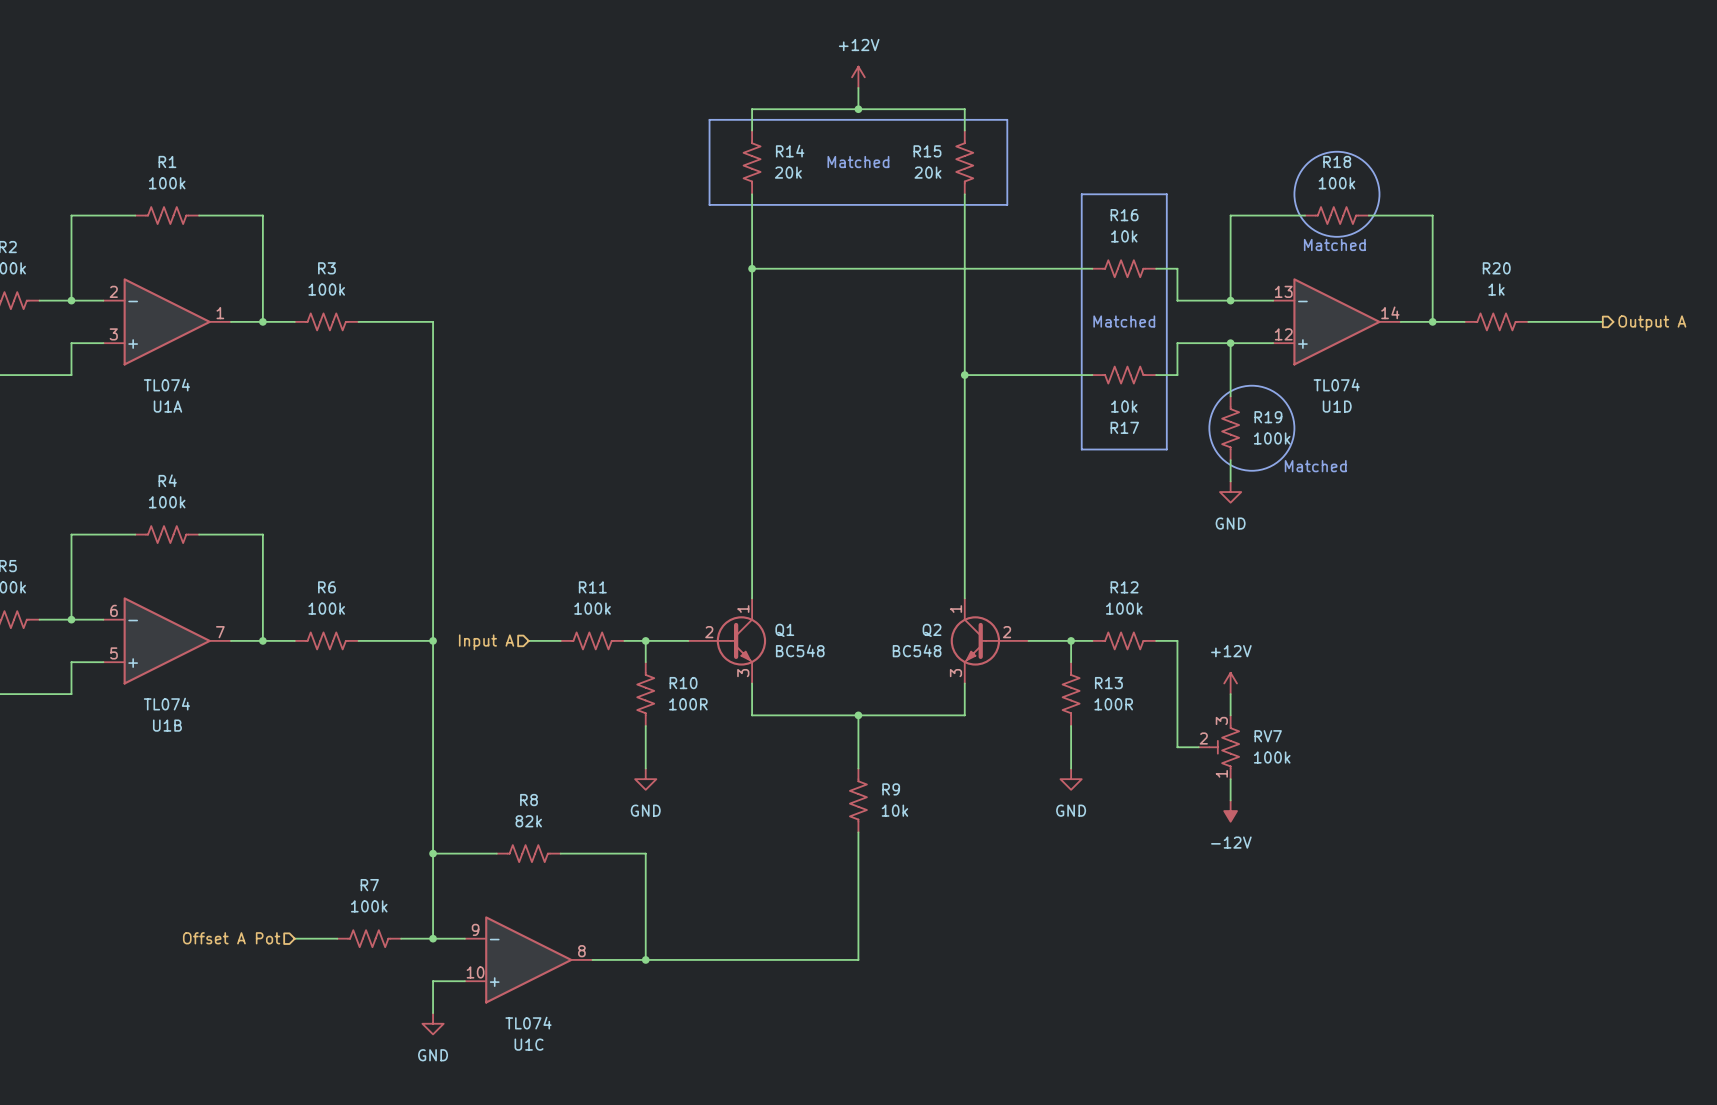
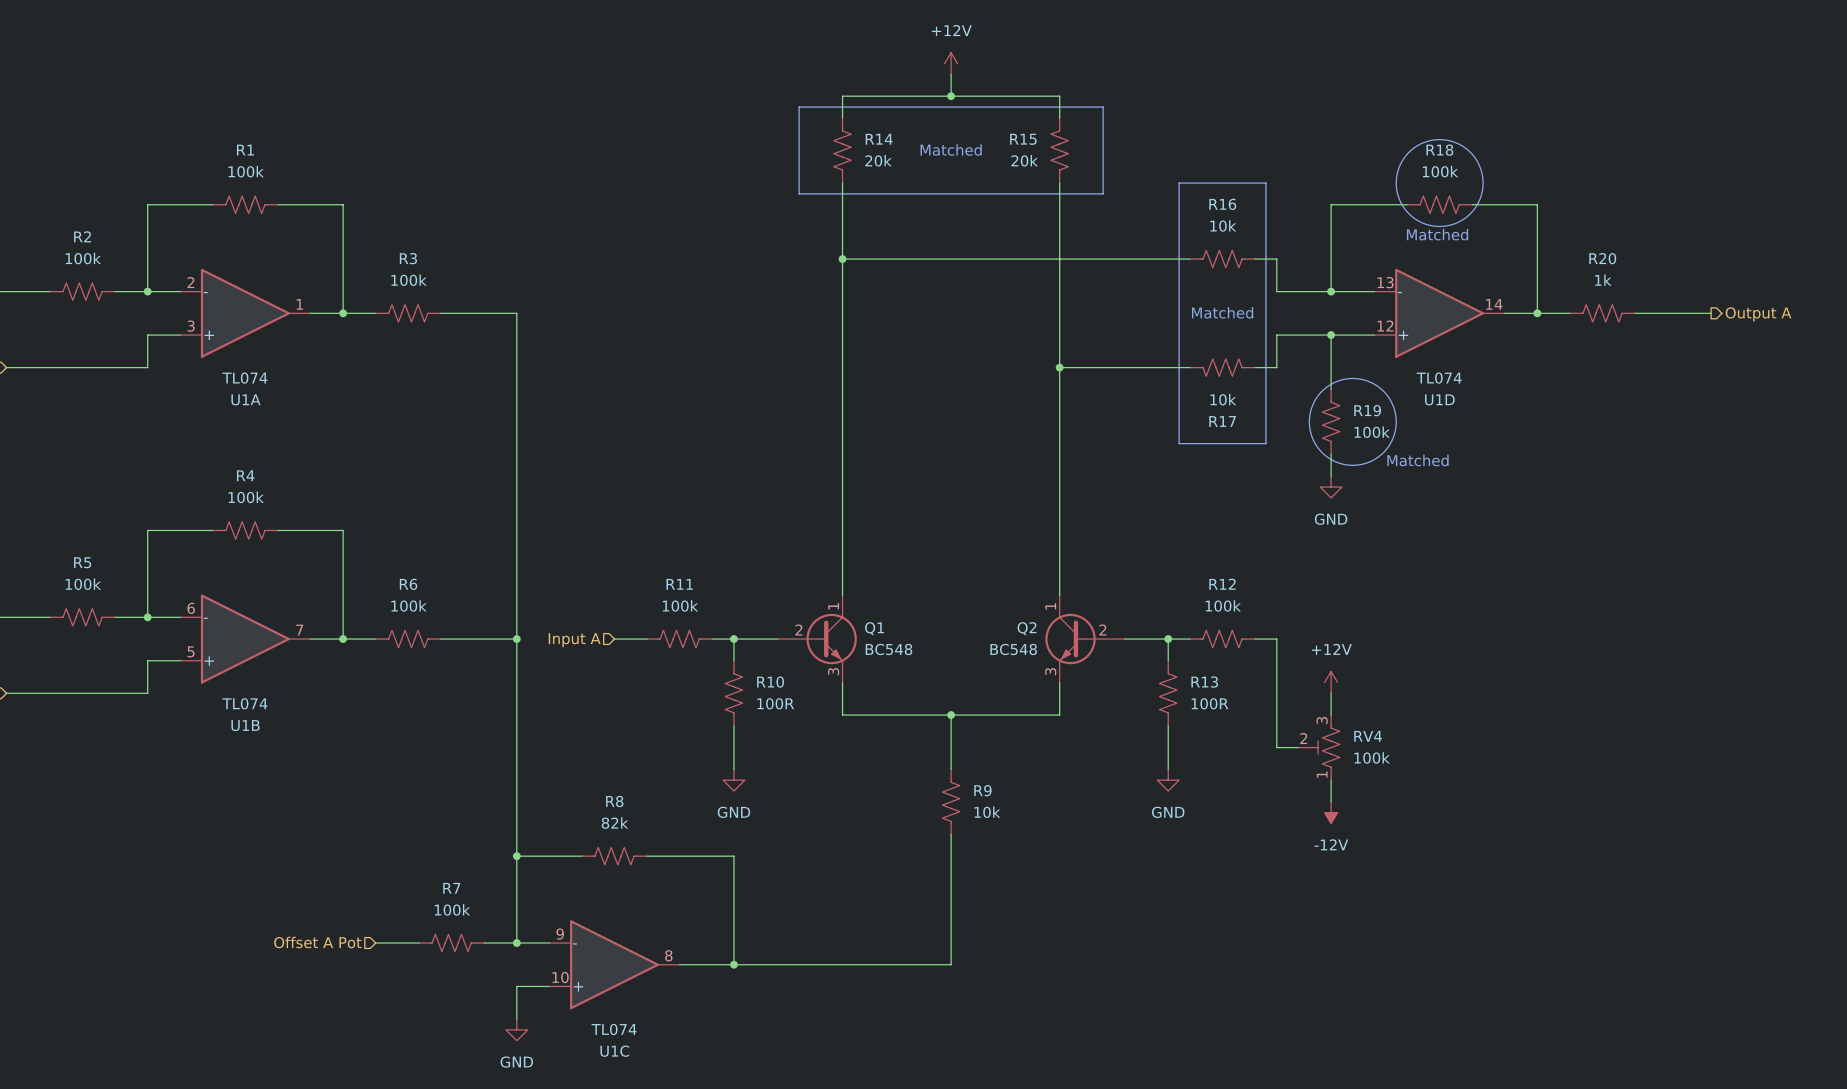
RV7 name: RV7 (1268, 736) -> RV4 (1368, 736)

